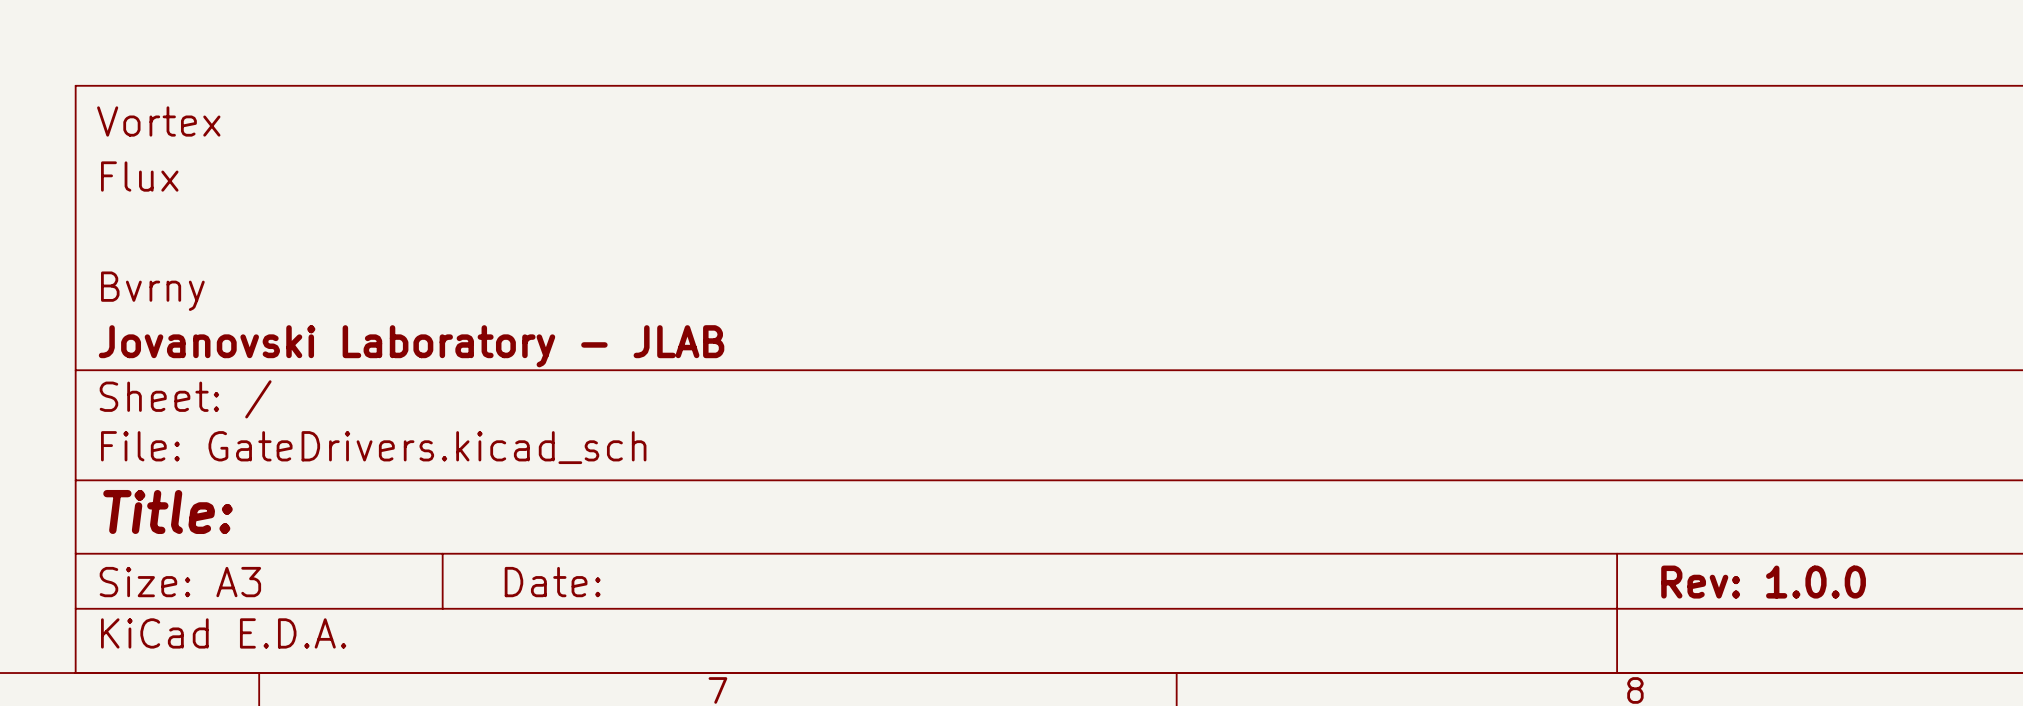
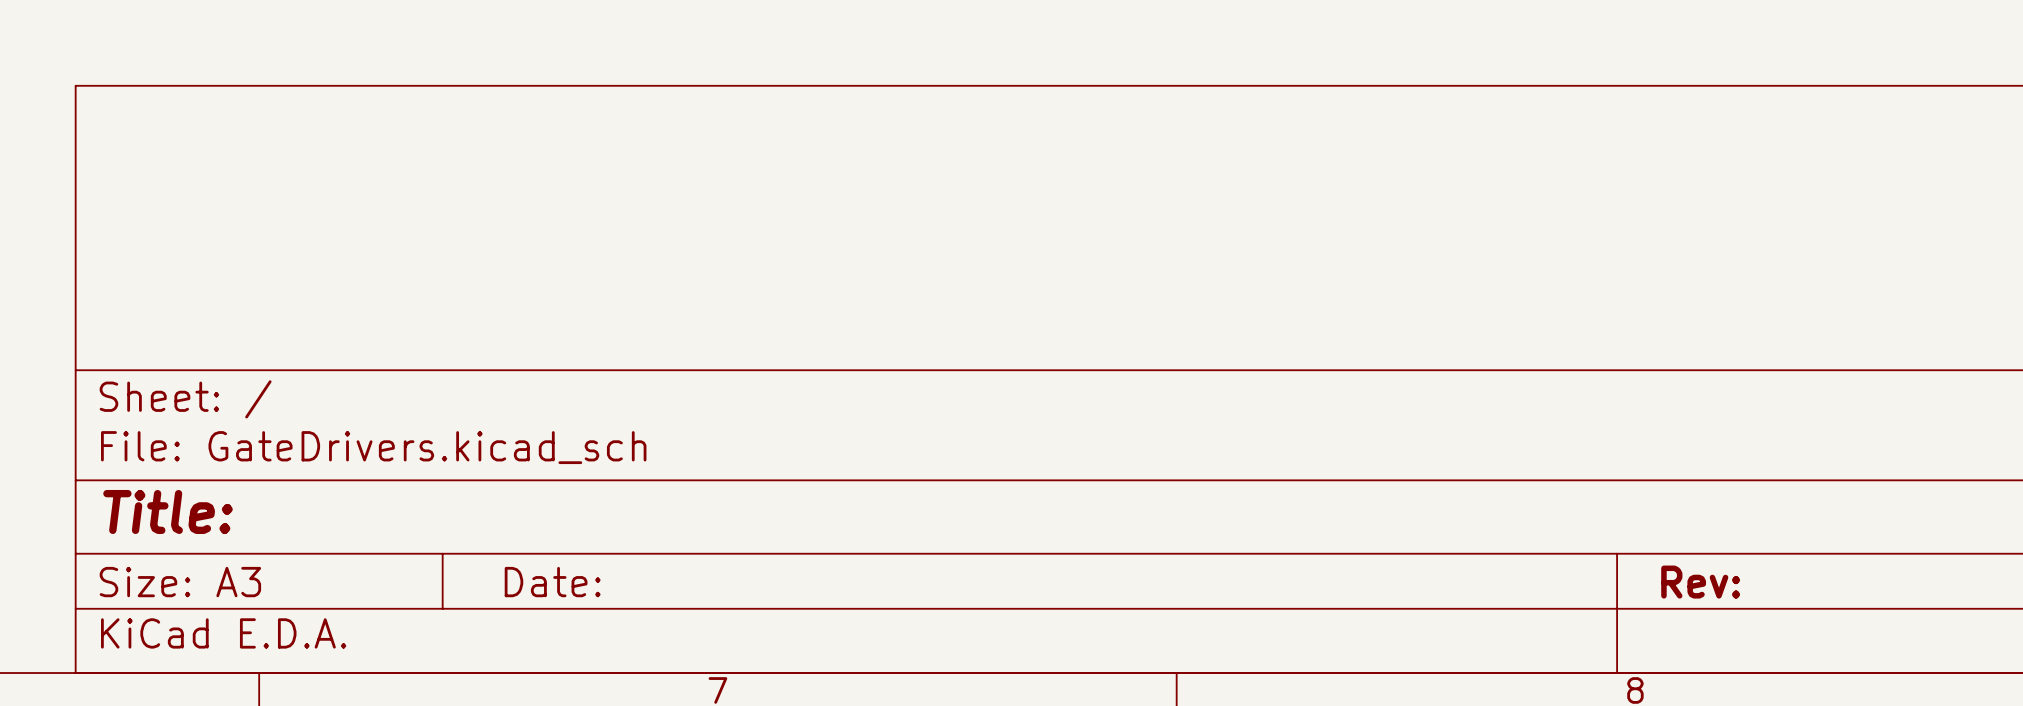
title block: Vortex (158, 121) -> none
title block: Flux (139, 176) -> none
title block: Bvrny (152, 291) -> none
title block: Jovanovski Laboratory - JLAB (411, 346) -> none
title block: Rev: 1.0.0 (1763, 582) -> Rev: (1700, 582)

